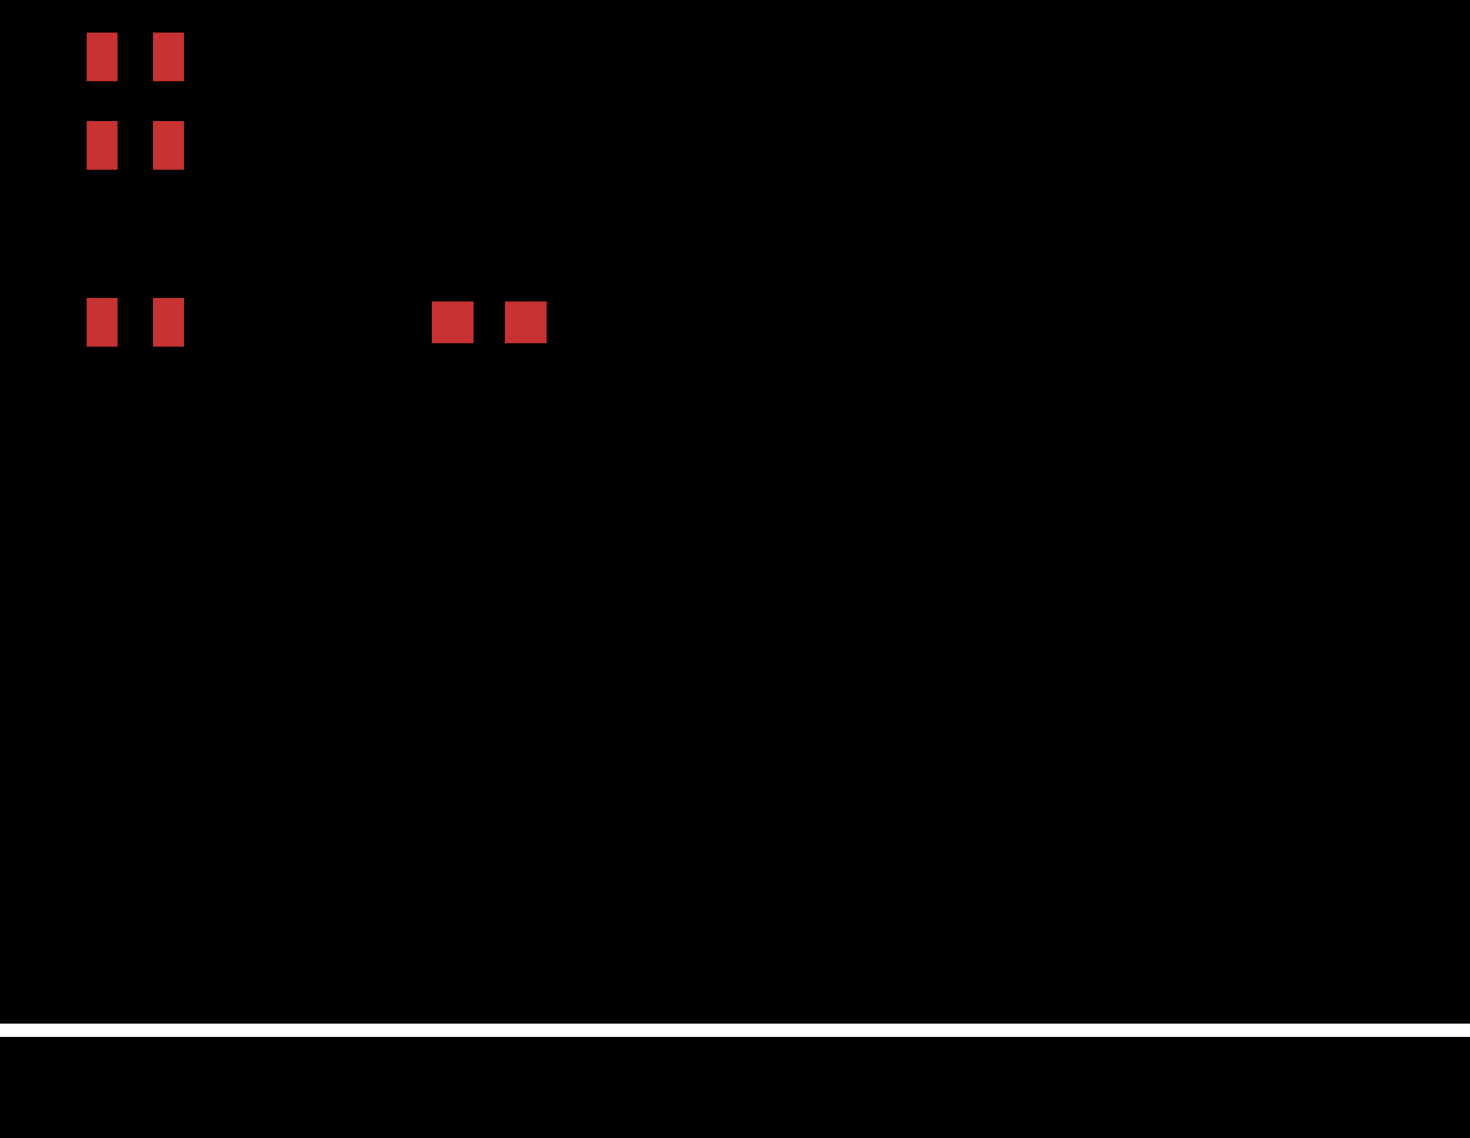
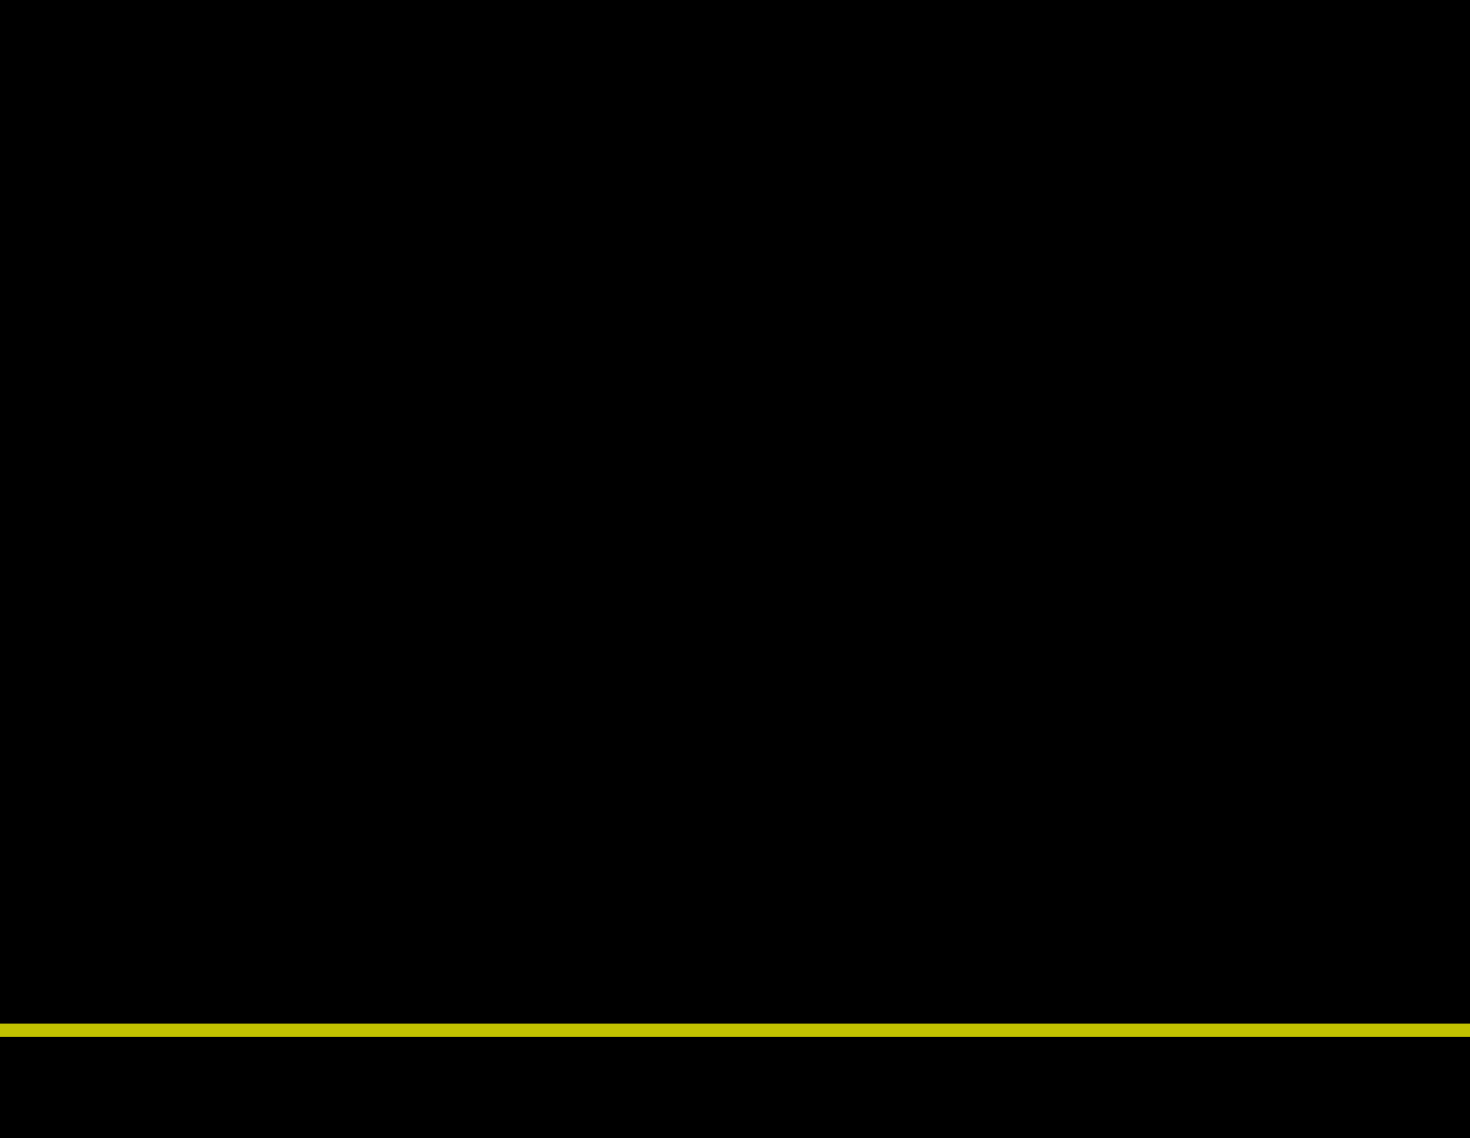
part: (135, 56) -> none
part: (135, 145) -> none
part: (135, 322) -> none
part: (489, 322) -> none

